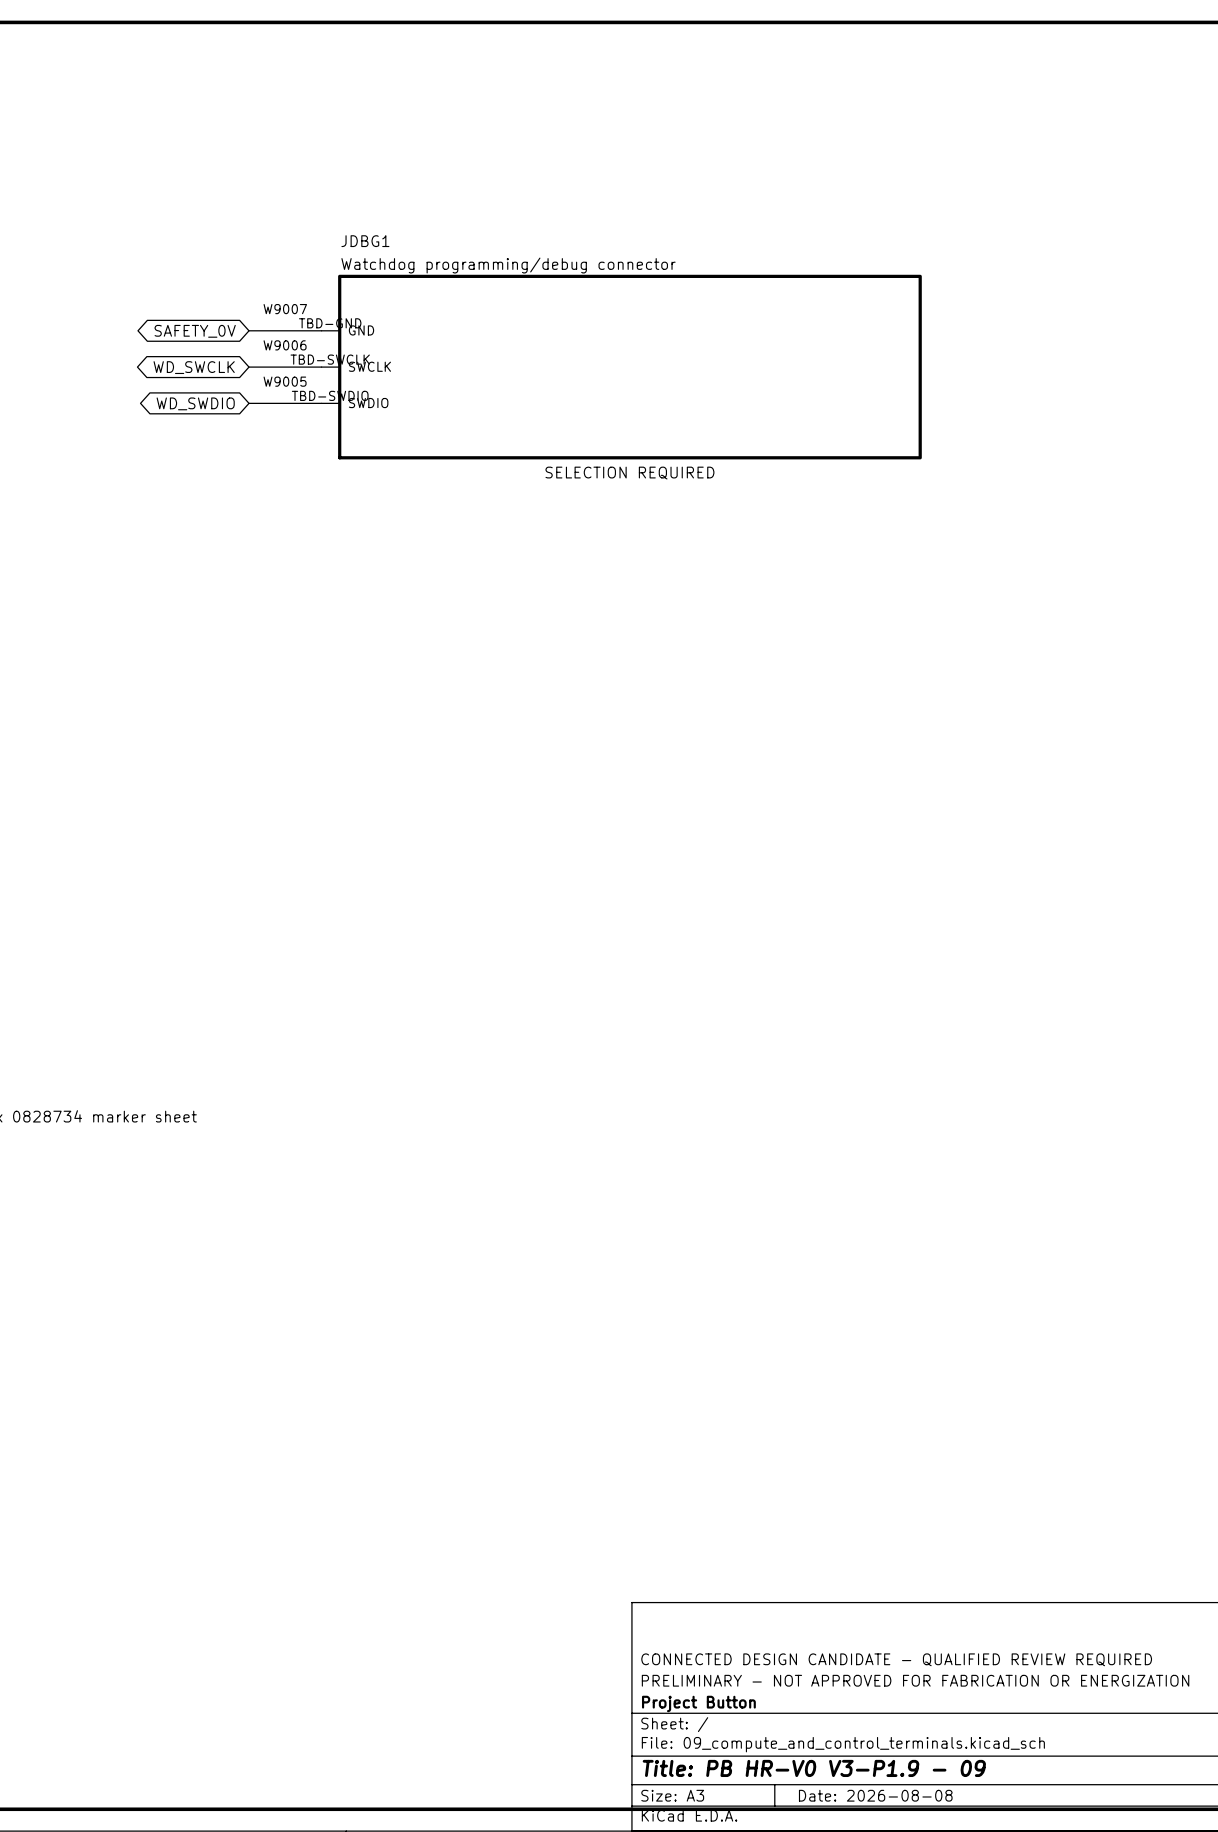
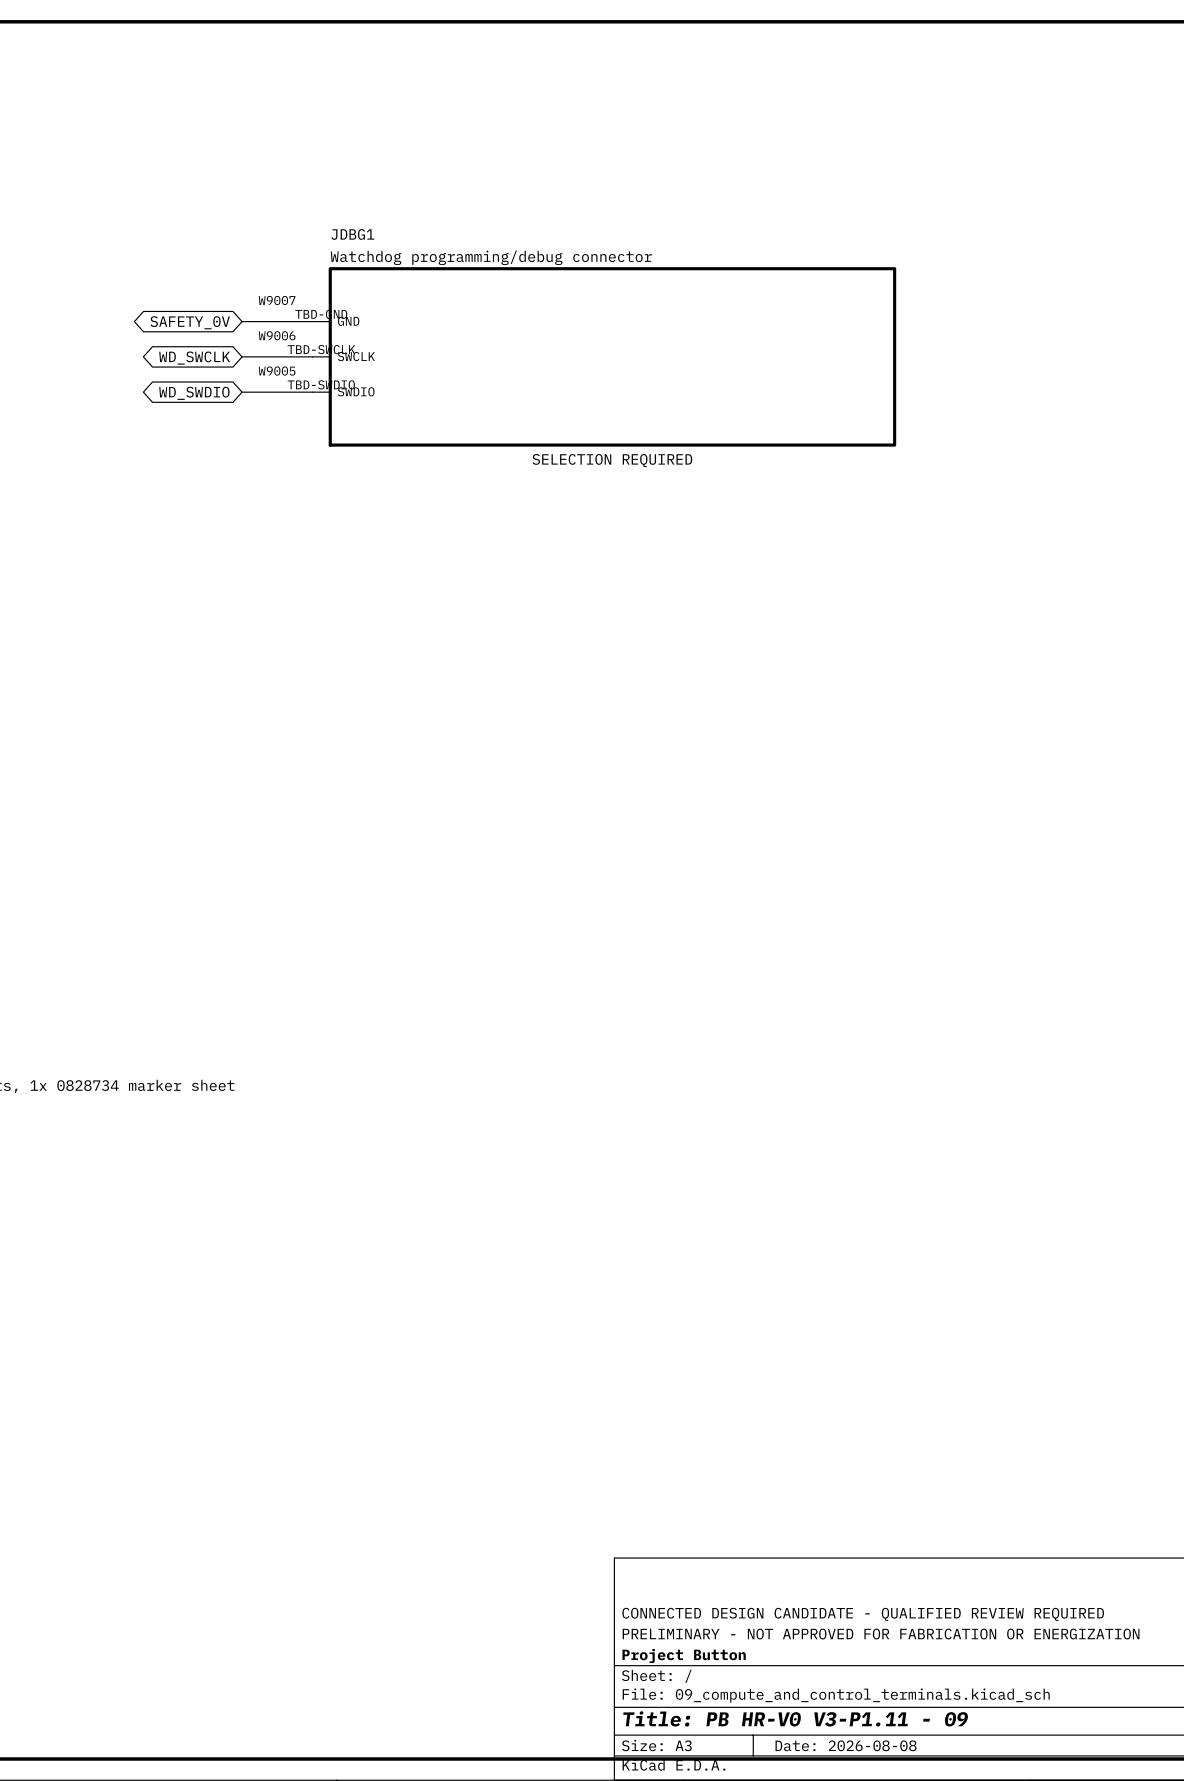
title block: Title: PB HR-V0 V3-P1.9 - 09 (814, 1768) -> Title: PB HR-V0 V3-P1.11 - 09 (795, 1718)

